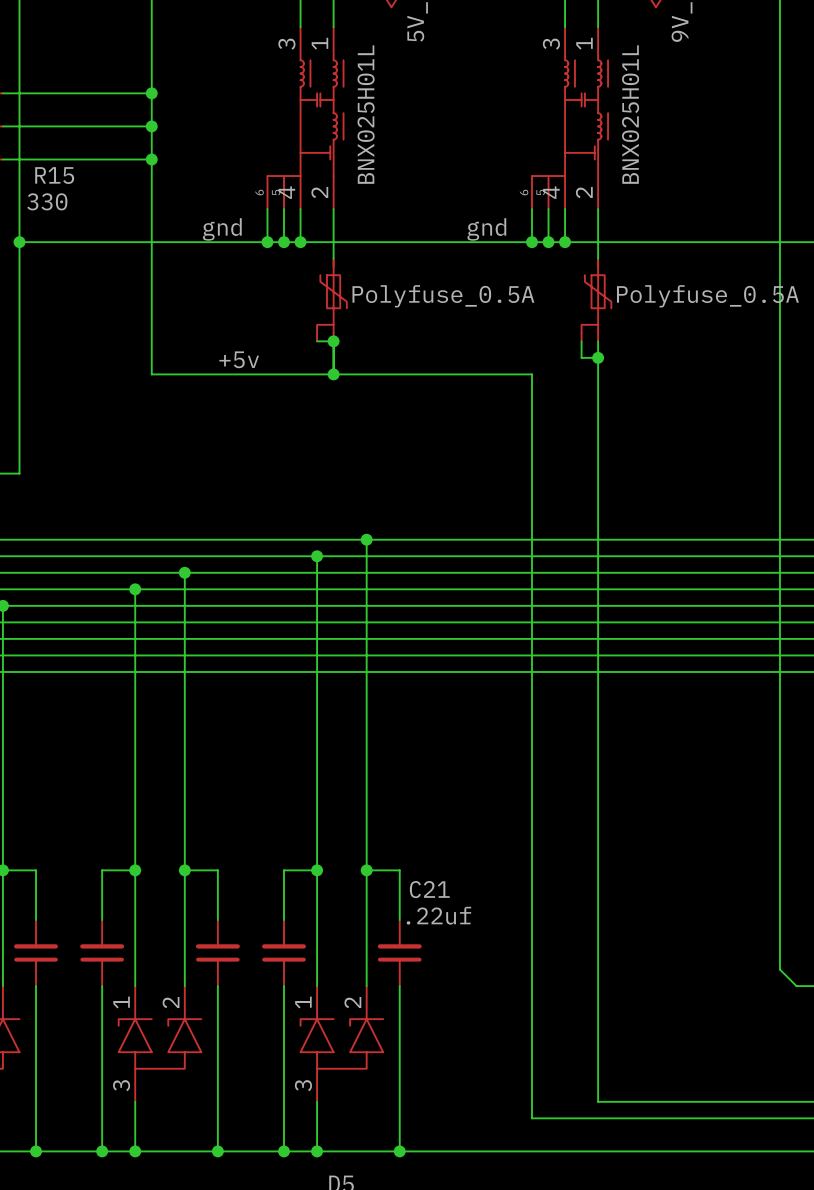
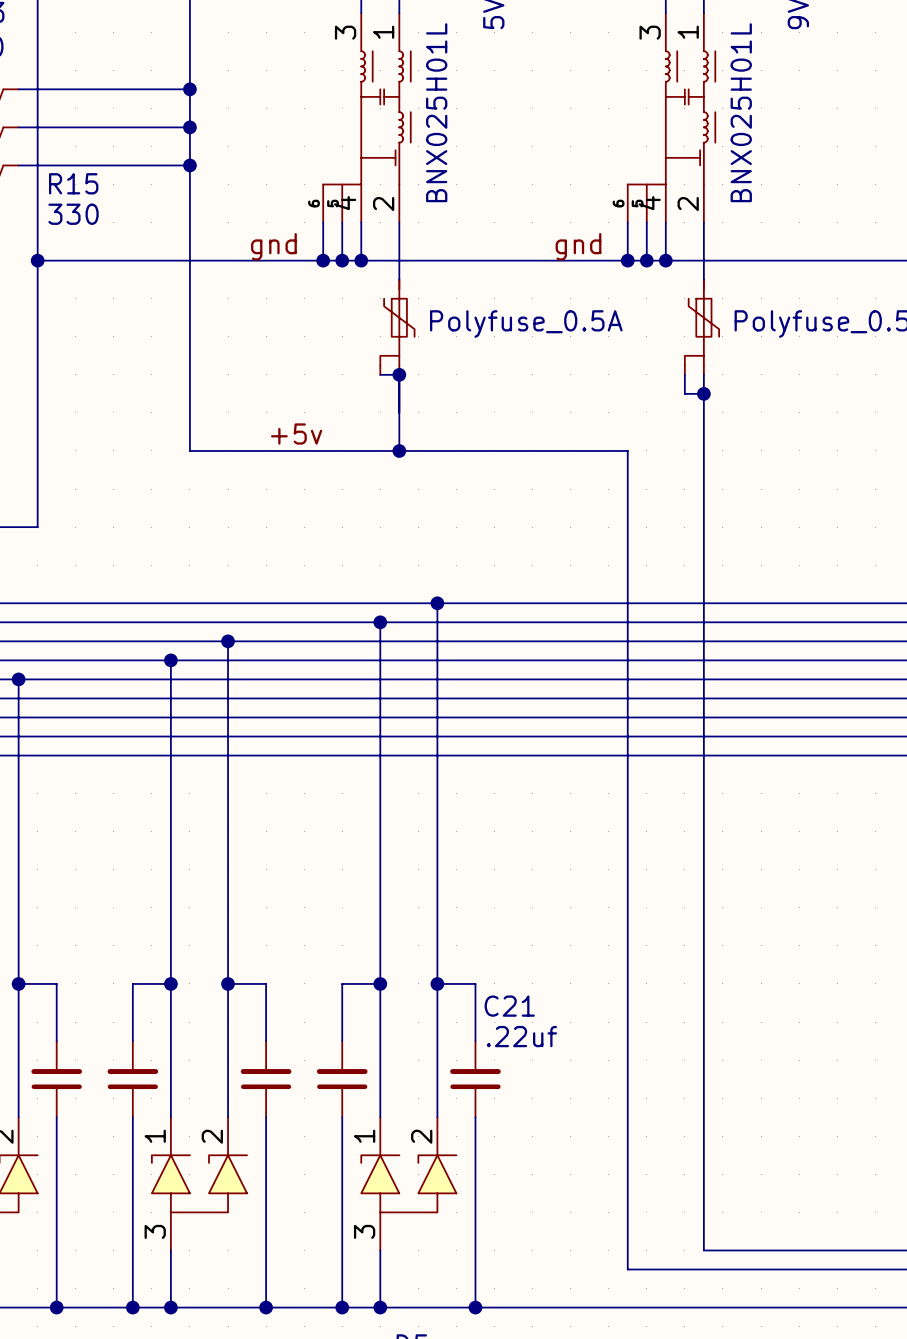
label position: +5v (239, 359) -> +5v (296, 434)
wire: (151, 374) (531, 374) (531, 407) -> (189, 412) (189, 450) (627, 450)
wire: none -> (399, 412) (399, 450)
junction position: (333, 374) -> (399, 450)

